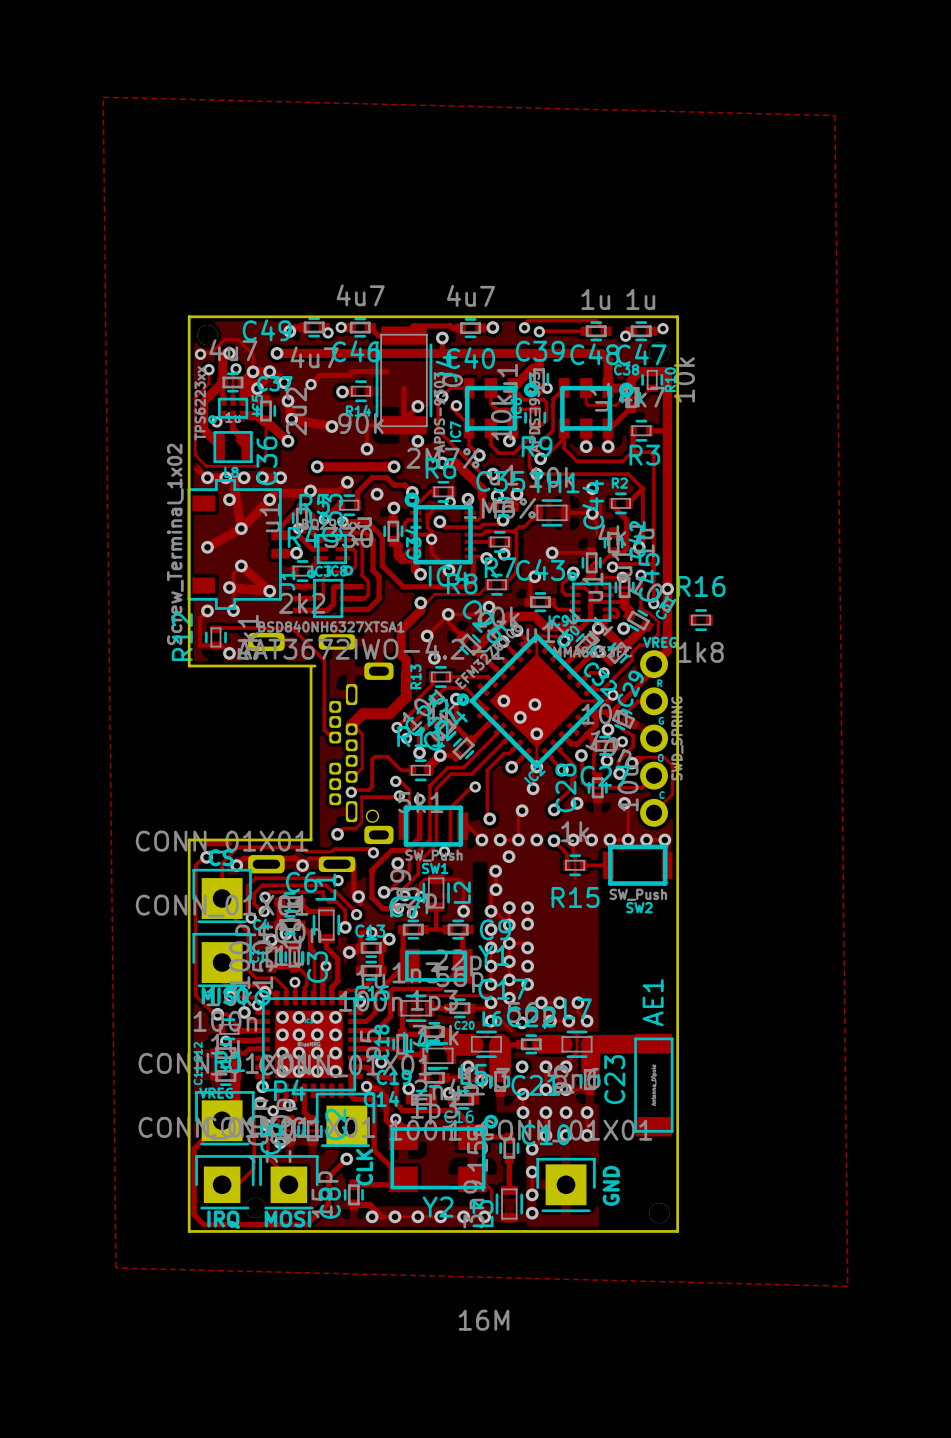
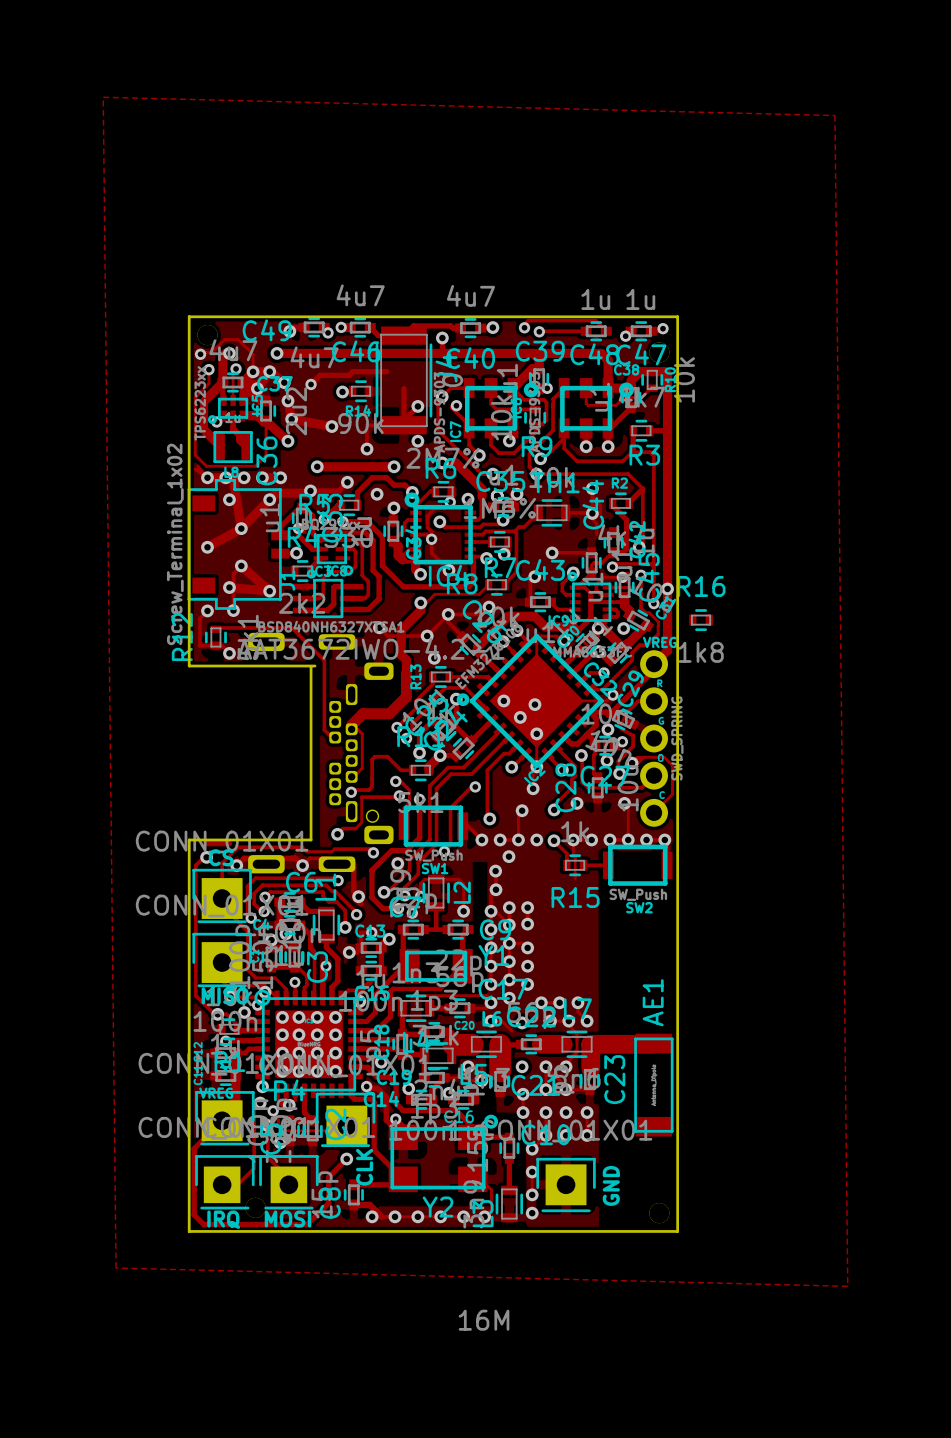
track: none -> (379, 627) (387, 636) (427, 636)
via: none -> (379, 627)

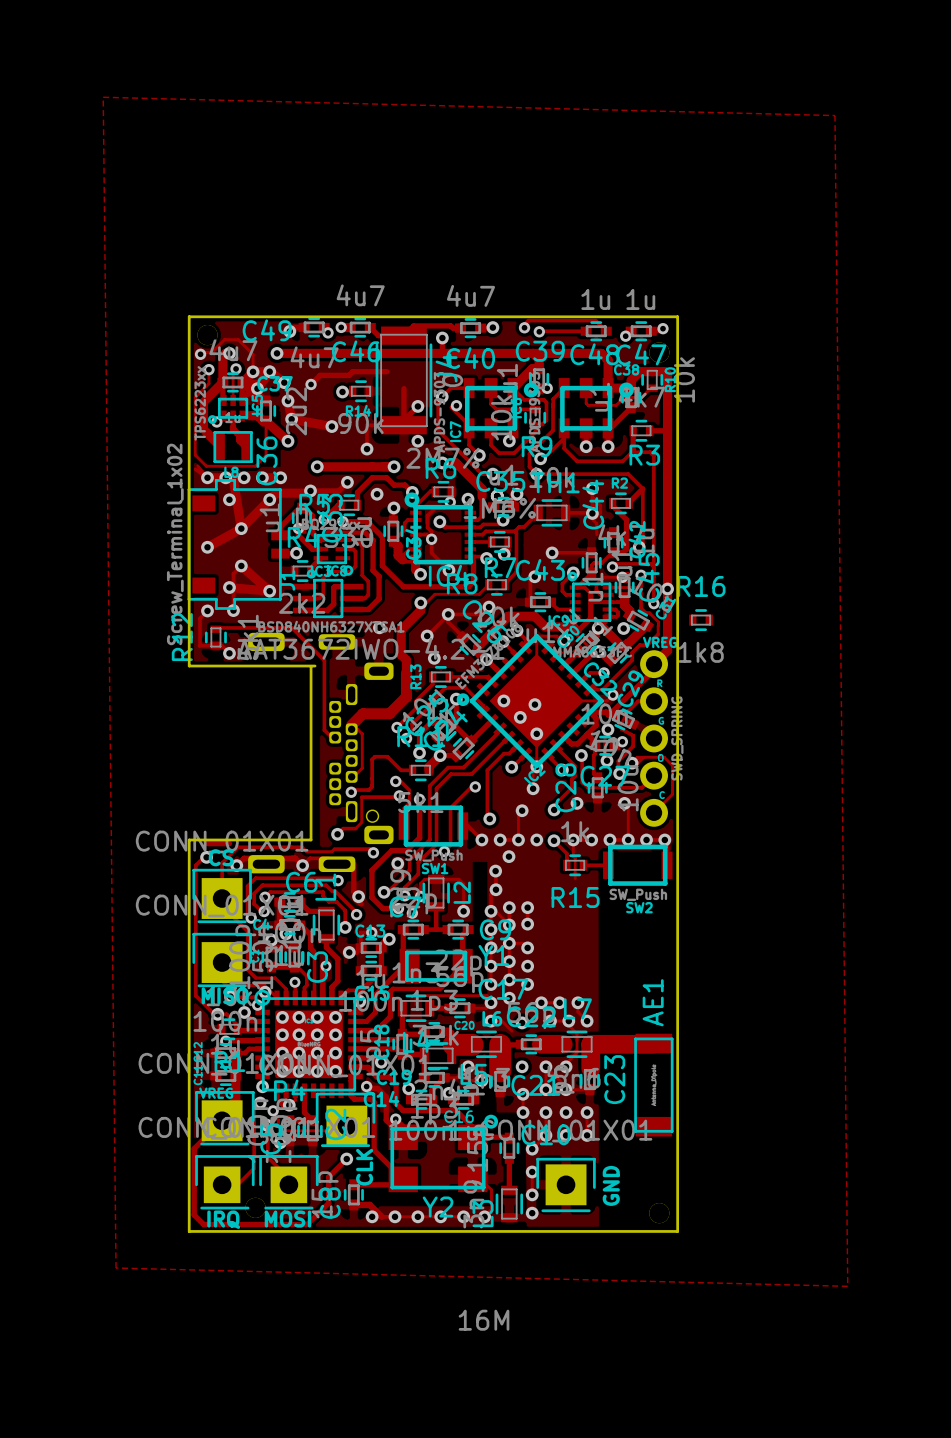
track: (379, 627) (387, 636) (427, 636) -> none
via: none -> (486, 659)

